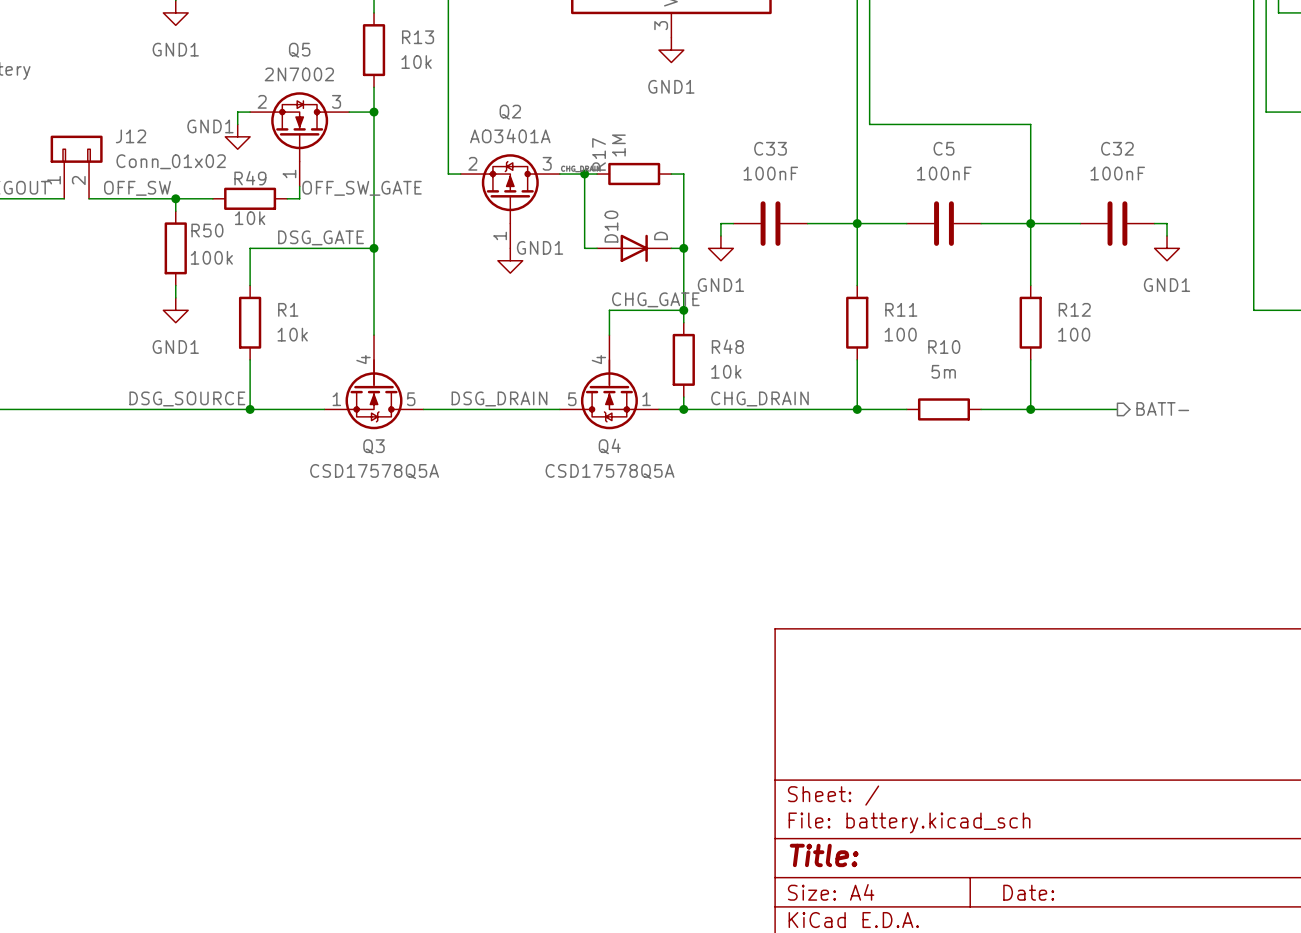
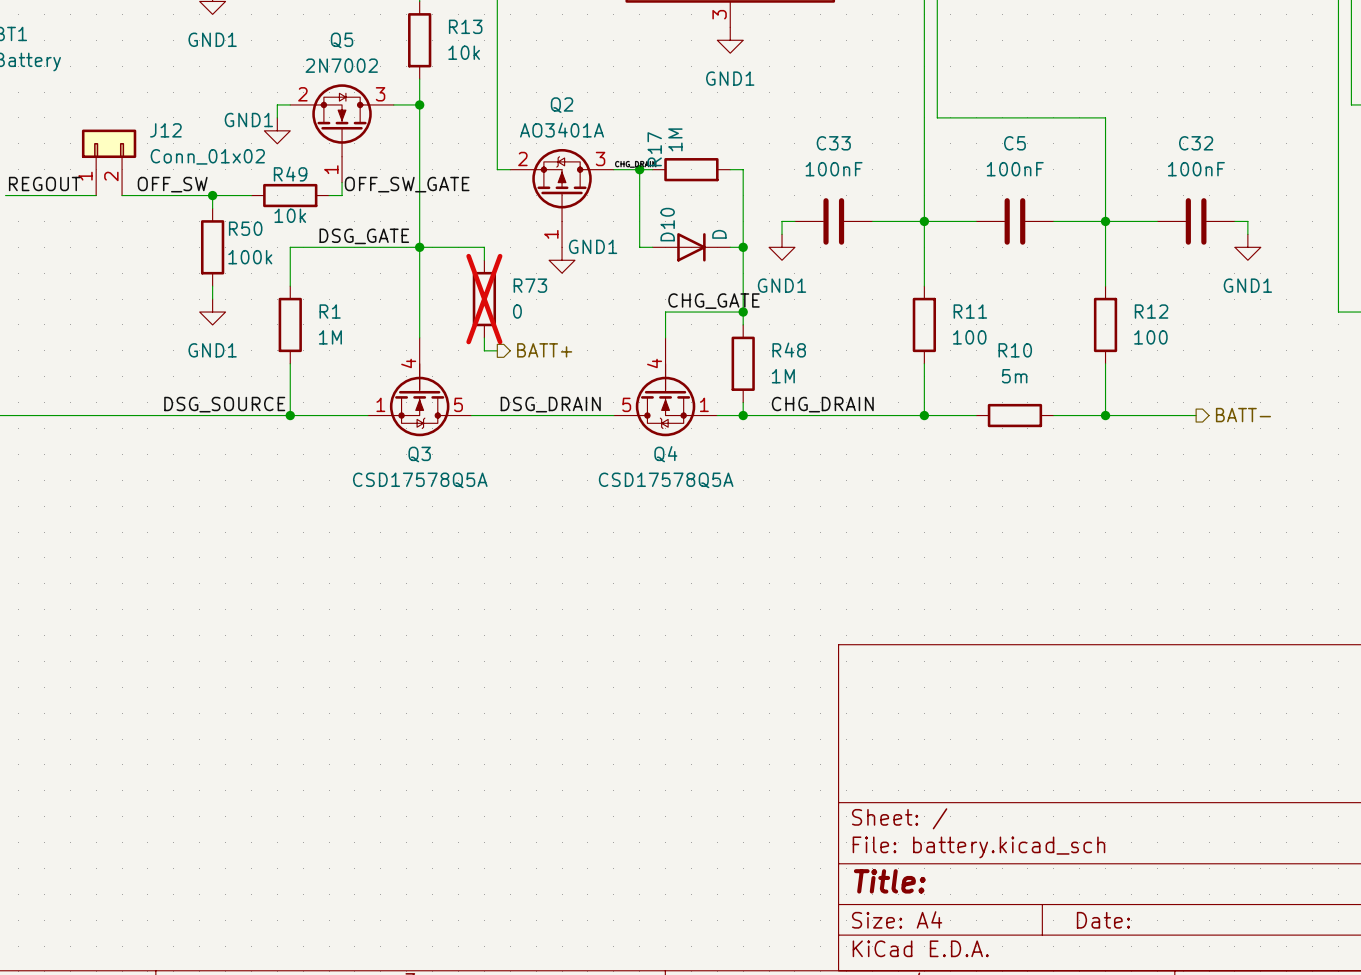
wire: none -> (419, 247) (484, 247) (484, 260)
R73: none -> 0 (484, 299)
R1 value: 10k (292, 334) -> 1M (330, 337)
wire: none -> (484, 337) (484, 350) (497, 350)
hierarchical label: none -> BATT+ (544, 350)
R48 value: 10k (726, 371) -> 1M (783, 376)

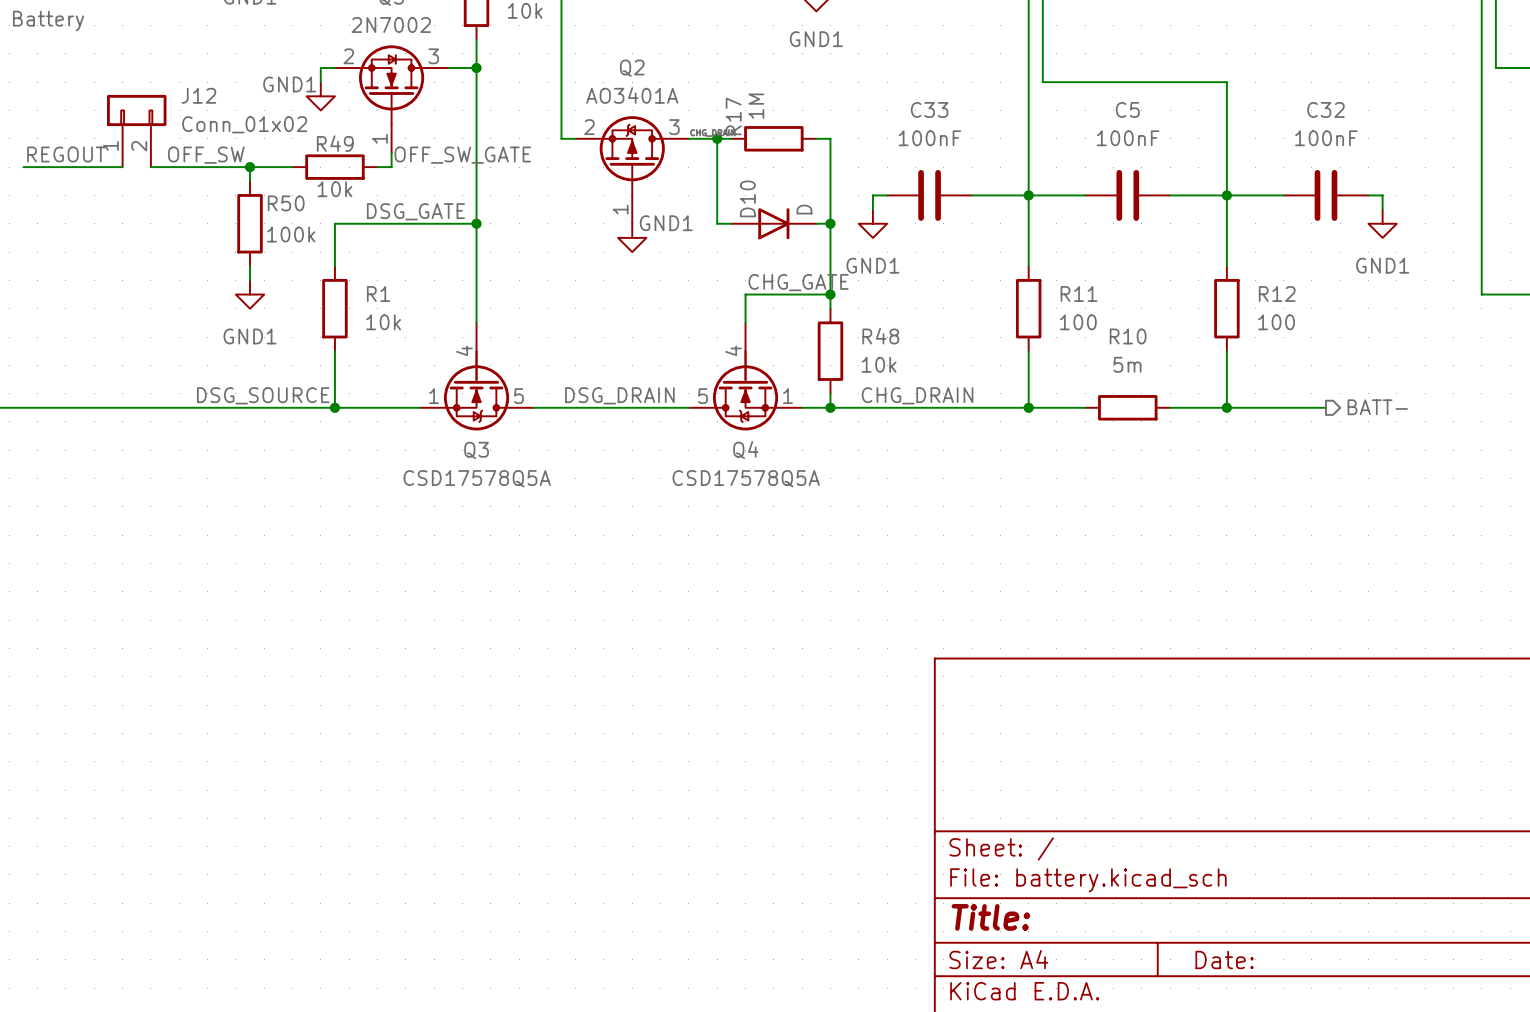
wire: (419, 247) (484, 247) (484, 260) -> none
R73: 0 (484, 299) -> none
R1 value: 1M (330, 337) -> 10k (383, 322)
wire: (484, 337) (484, 350) (497, 350) -> none
hierarchical label: BATT+ (544, 350) -> none
R48 value: 1M (783, 376) -> 10k (879, 364)

